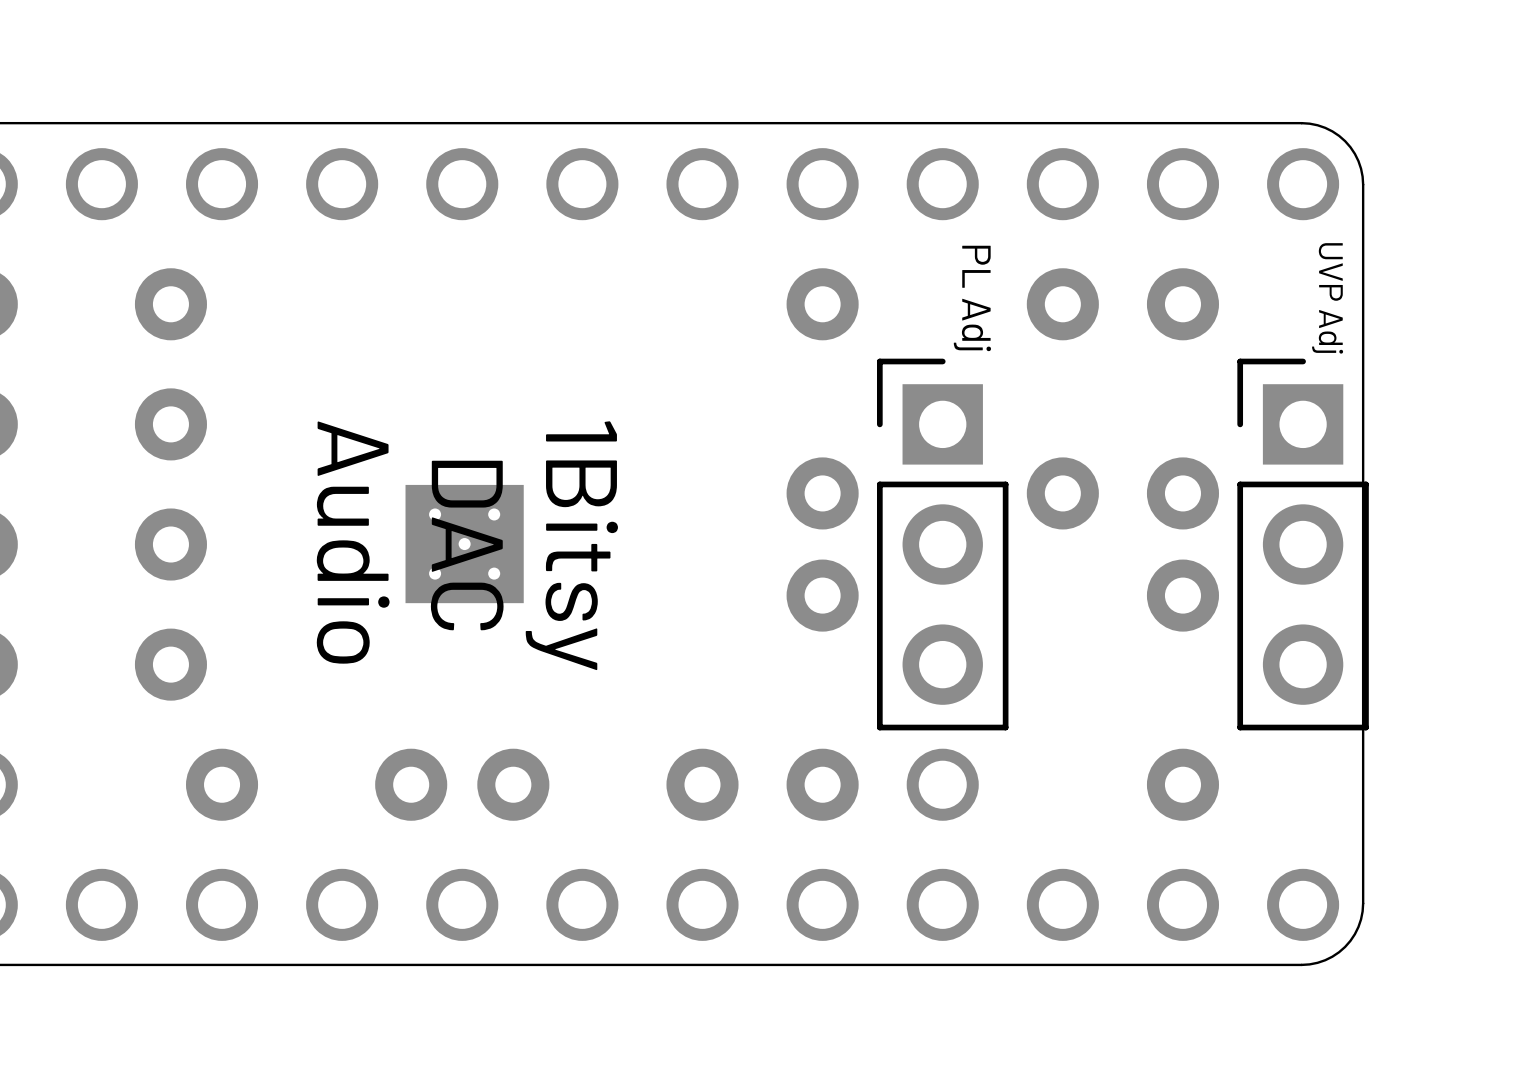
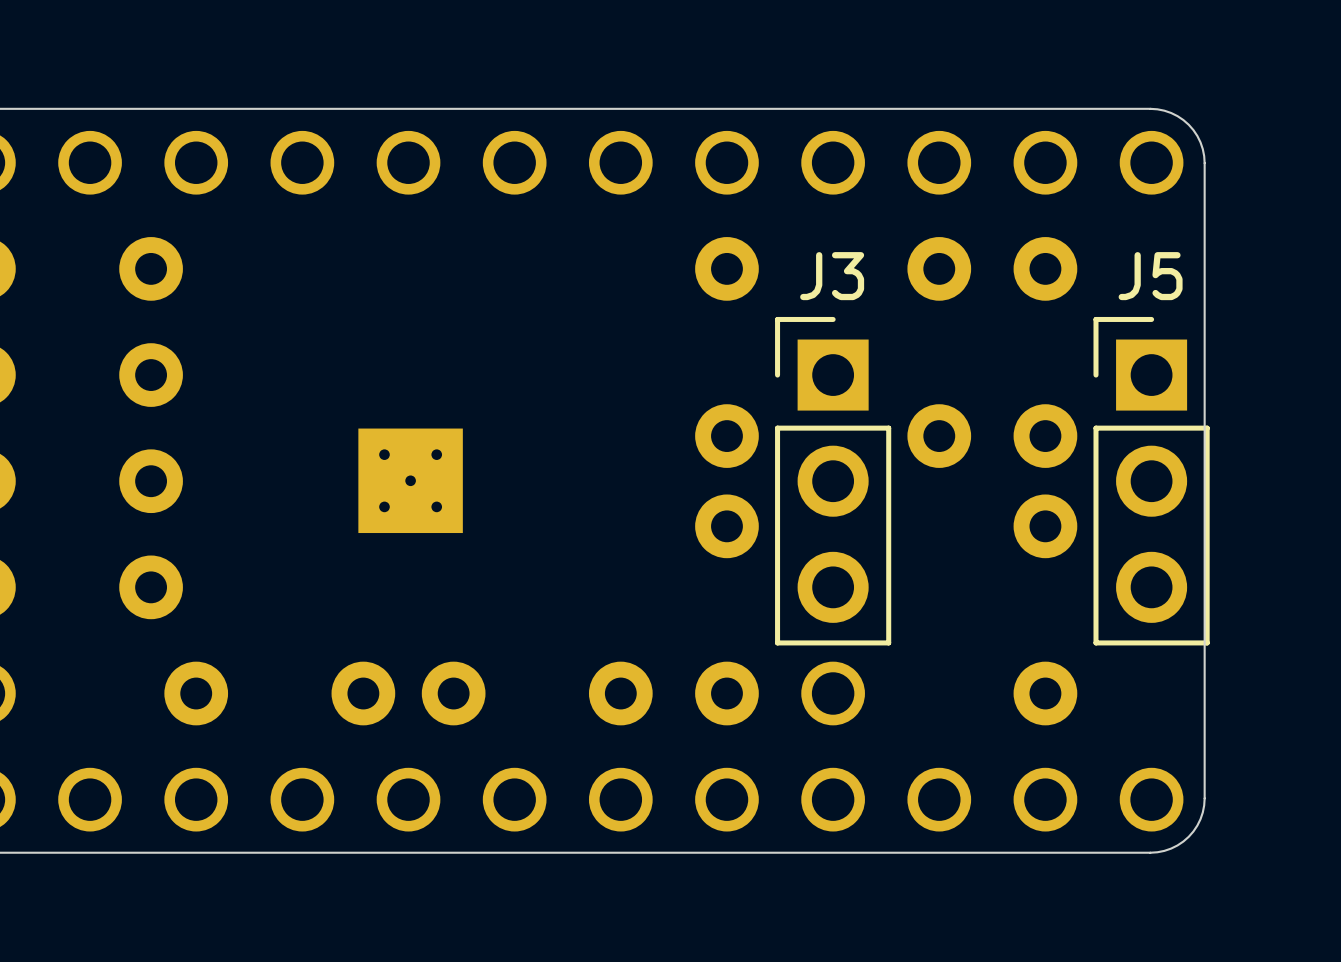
PL Adj name: PL Adj (972, 298) -> J3 (832, 276)
UVP Adj name: UVP Adj (1327, 298) -> J5 (1150, 276)
text: Audio (353, 542) -> none
text: DAC (467, 545) -> none
text: 1Bitsy (571, 545) -> none

